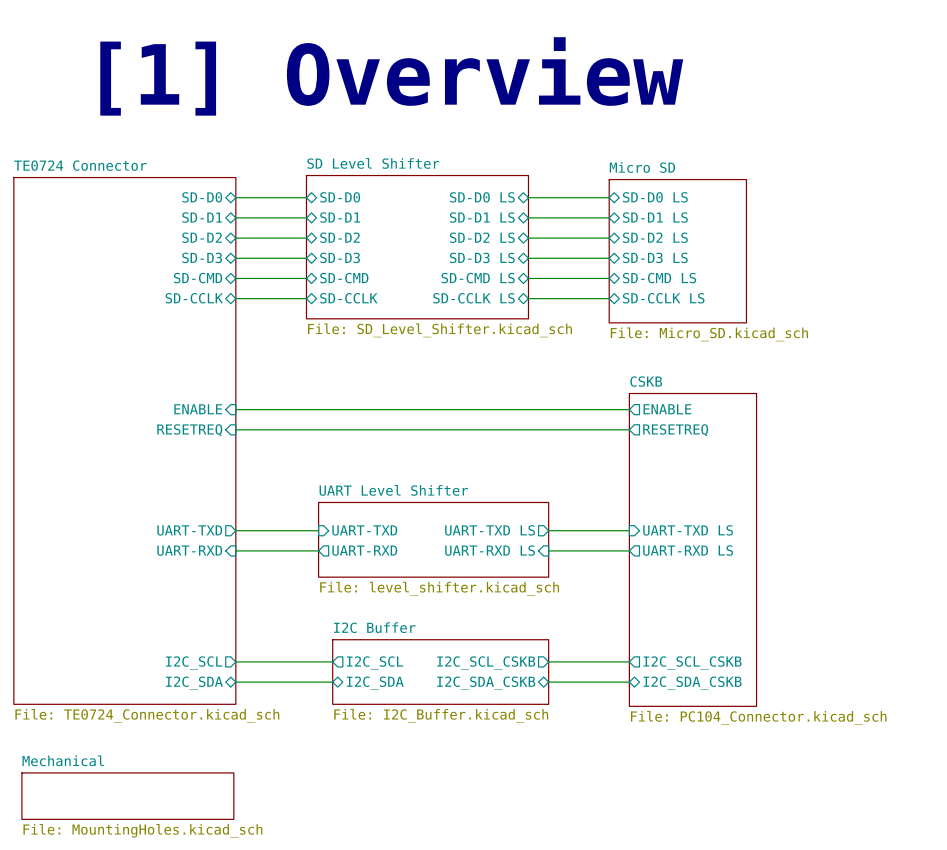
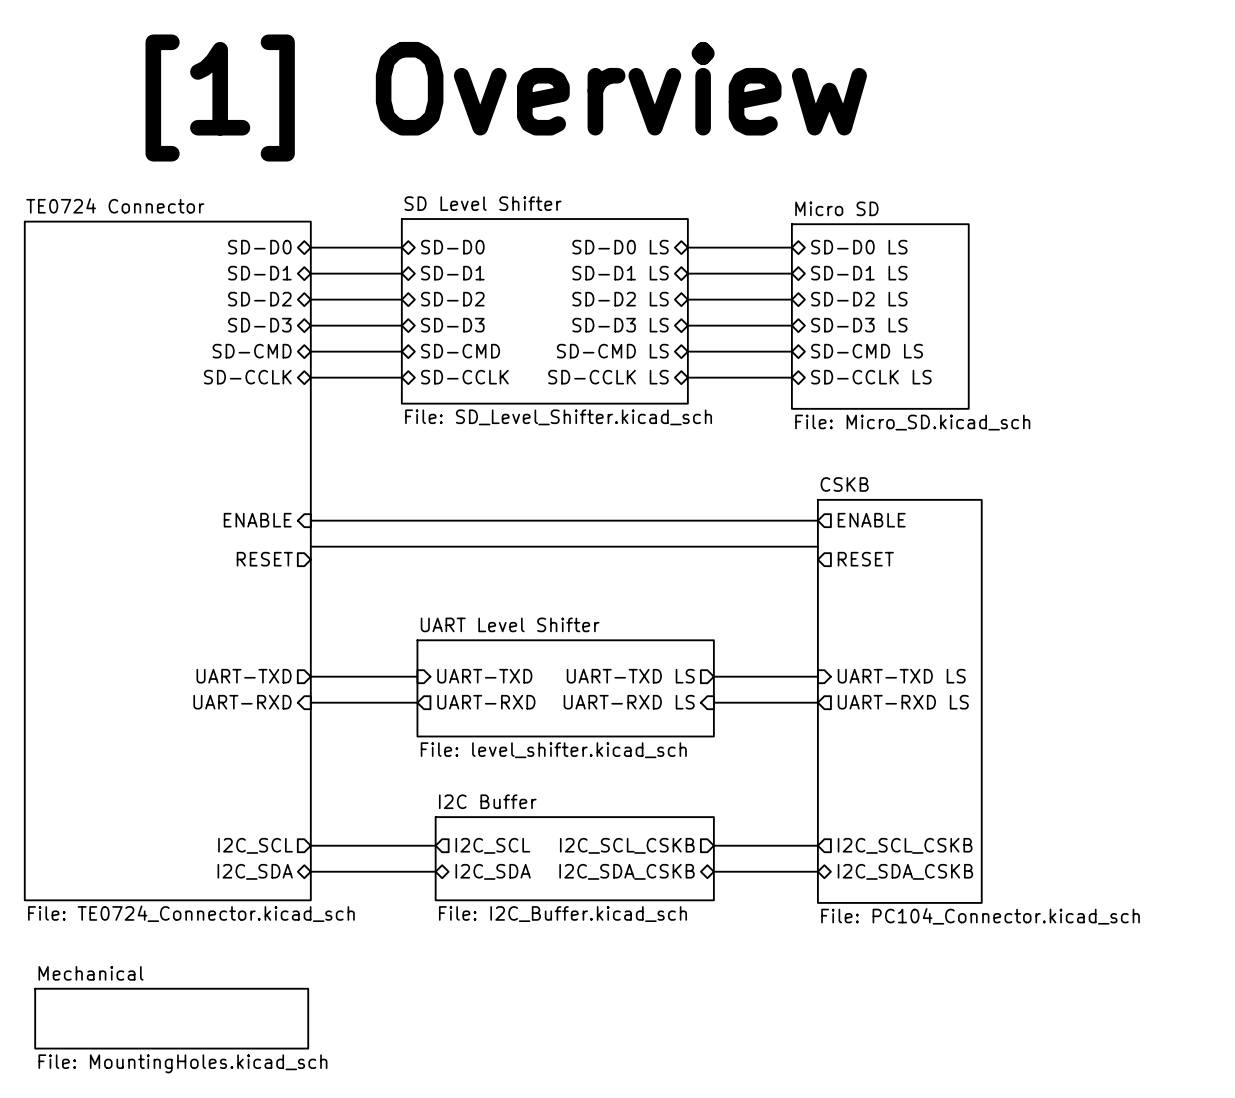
sheet pin shape: input (189, 430) -> output (264, 559)
sheet pin: RESETREQ (189, 430) -> RESET (264, 559)
sheet pin: RESETREQ (675, 430) -> RESET (865, 559)

